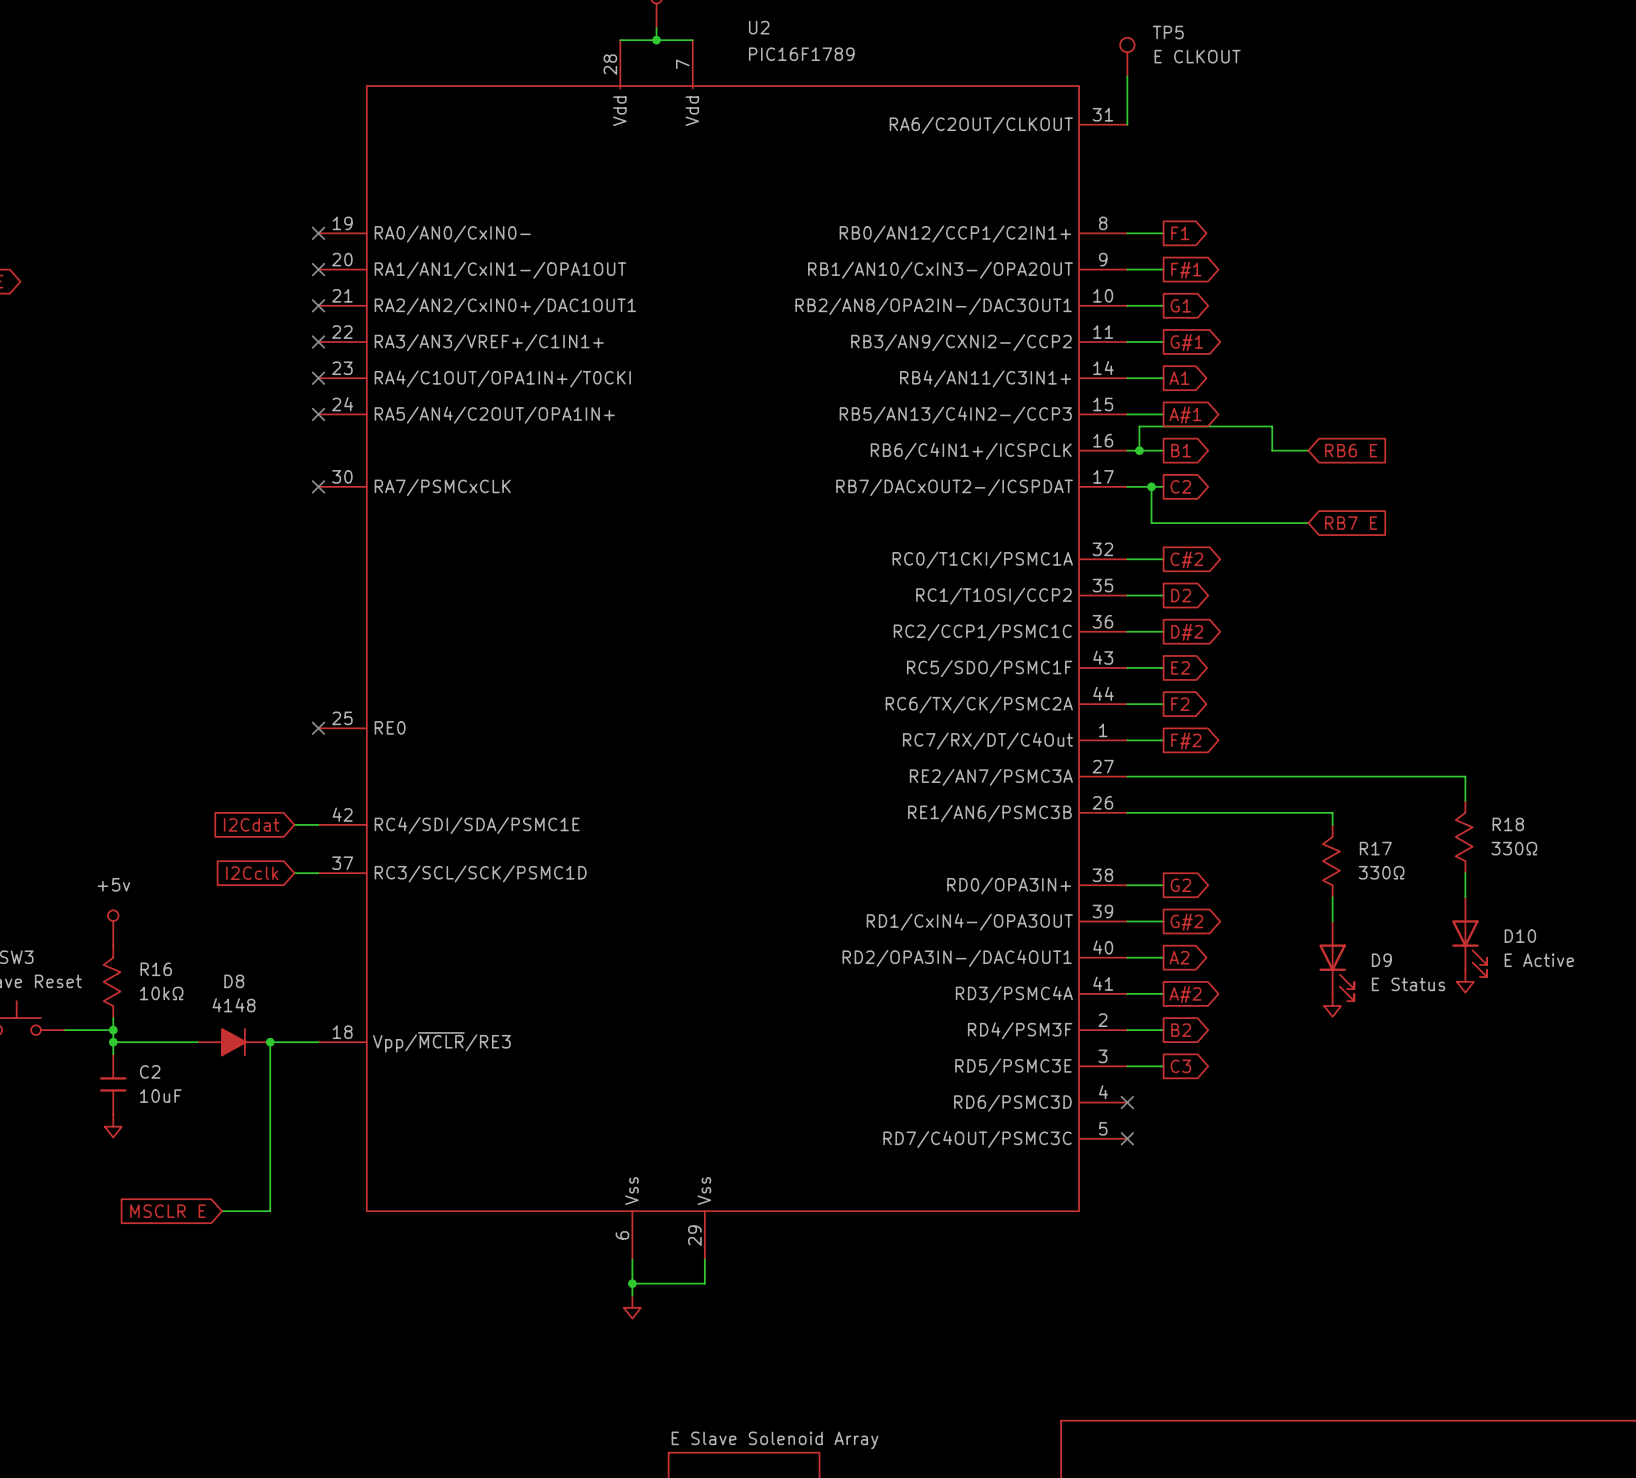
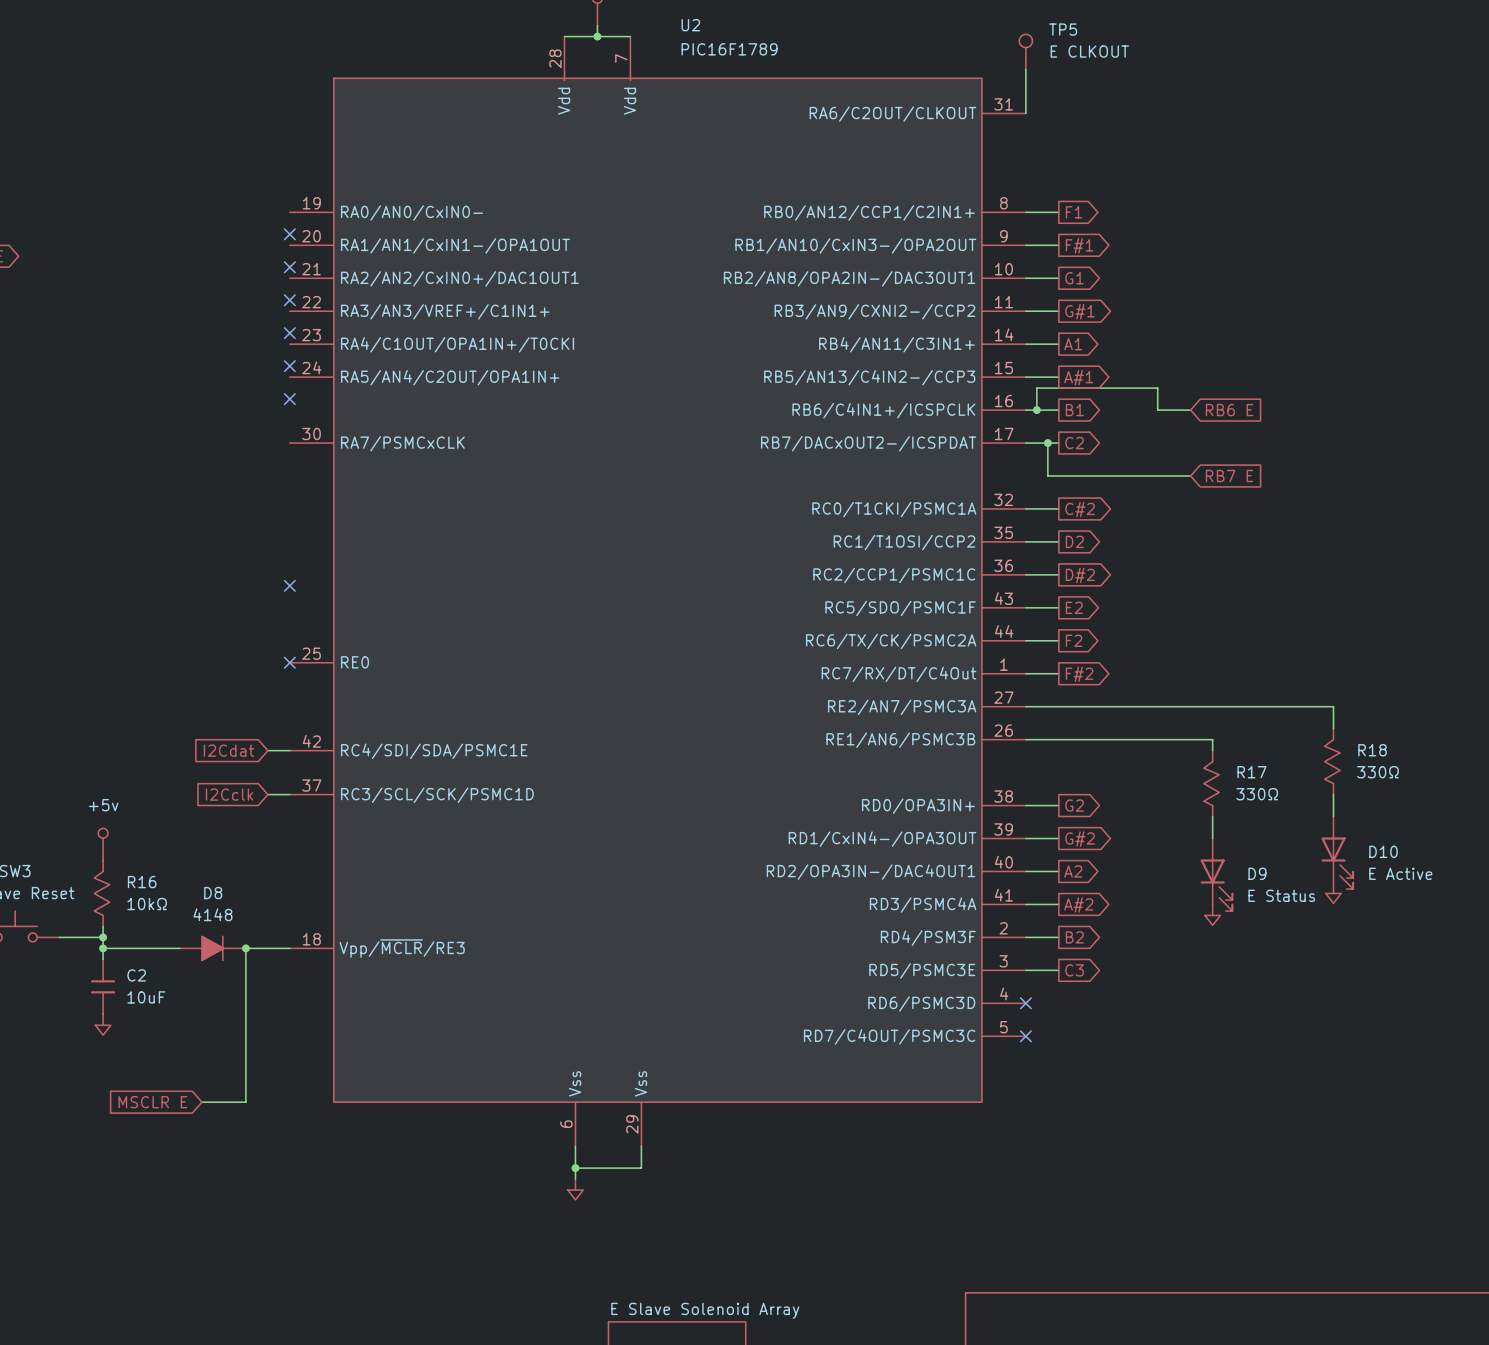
no-connect mark: (318, 233) -> none
no-connect mark: none -> (289, 234)
no-connect mark: (318, 269) -> none
no-connect mark: none -> (289, 267)
no-connect mark: (318, 305) -> none
no-connect mark: none -> (289, 300)
no-connect mark: (318, 341) -> none
no-connect mark: none -> (289, 333)
no-connect mark: (318, 378) -> none
no-connect mark: none -> (289, 366)
no-connect mark: (318, 414) -> none
no-connect mark: none -> (289, 399)
no-connect mark: (318, 486) -> none
no-connect mark: none -> (289, 585)

